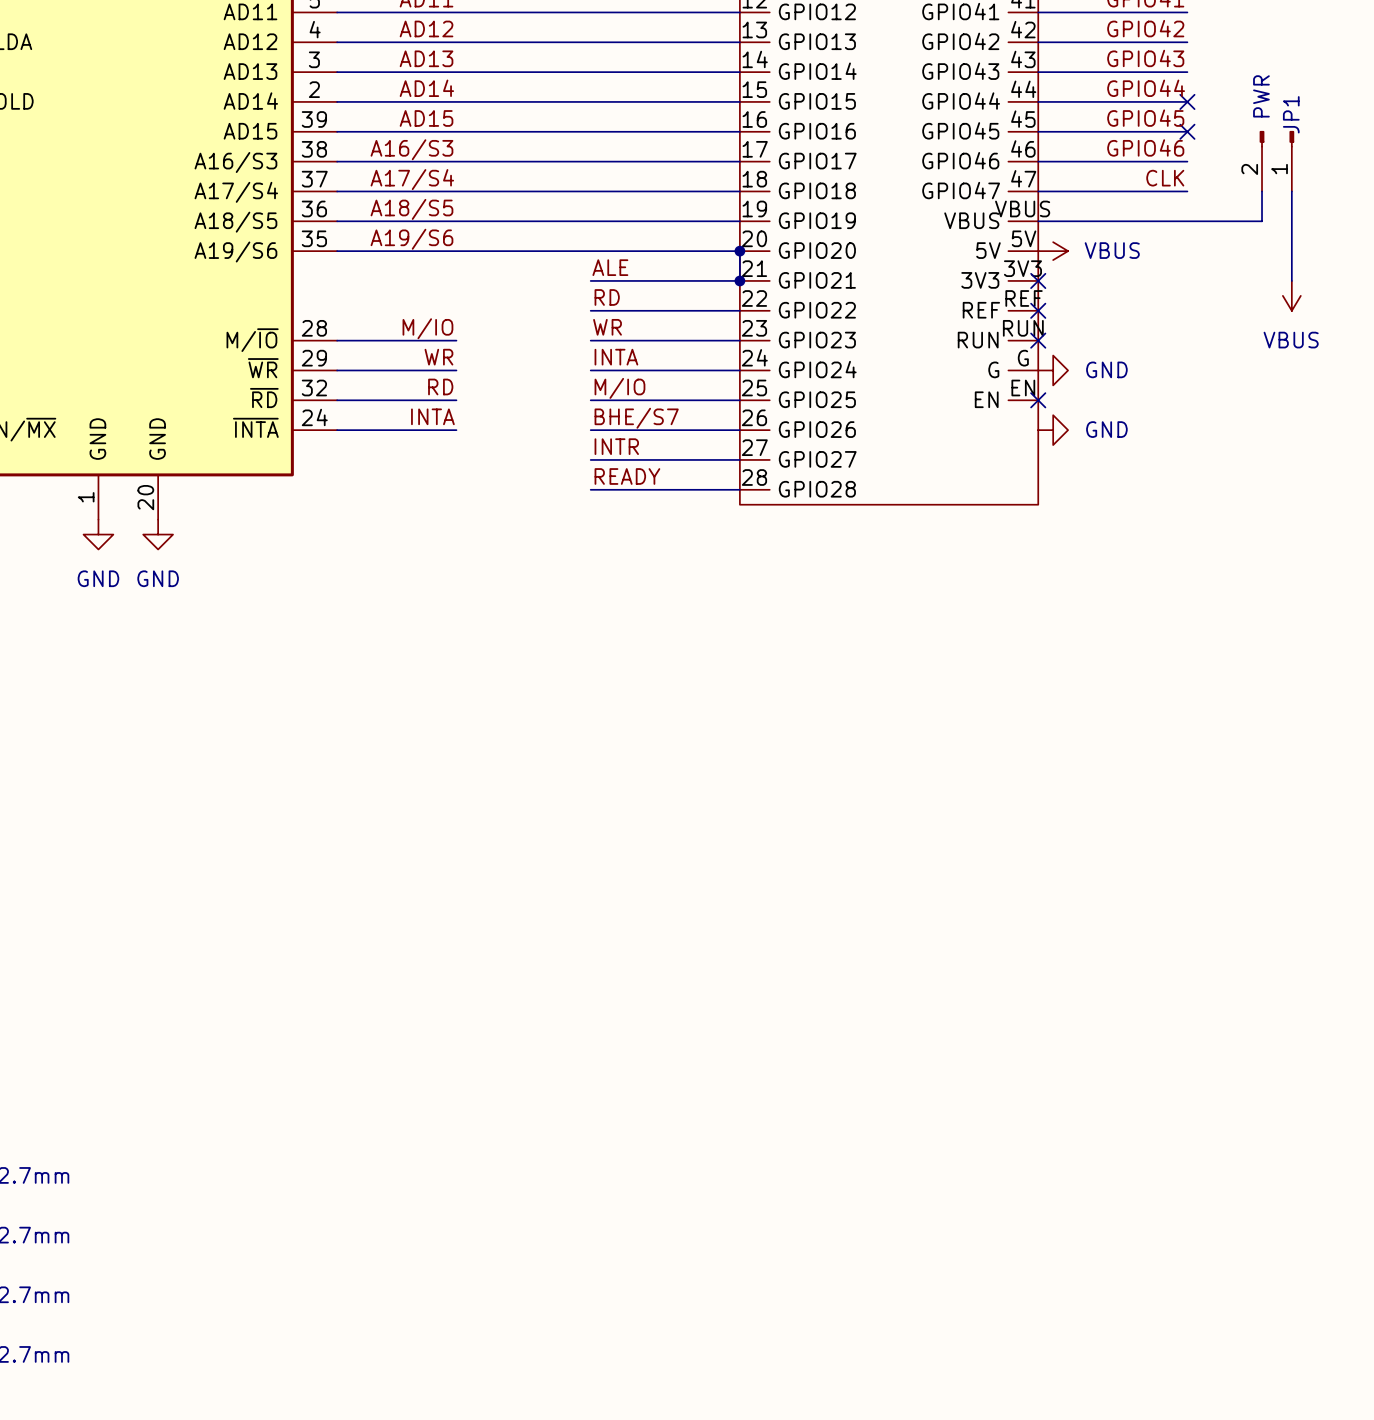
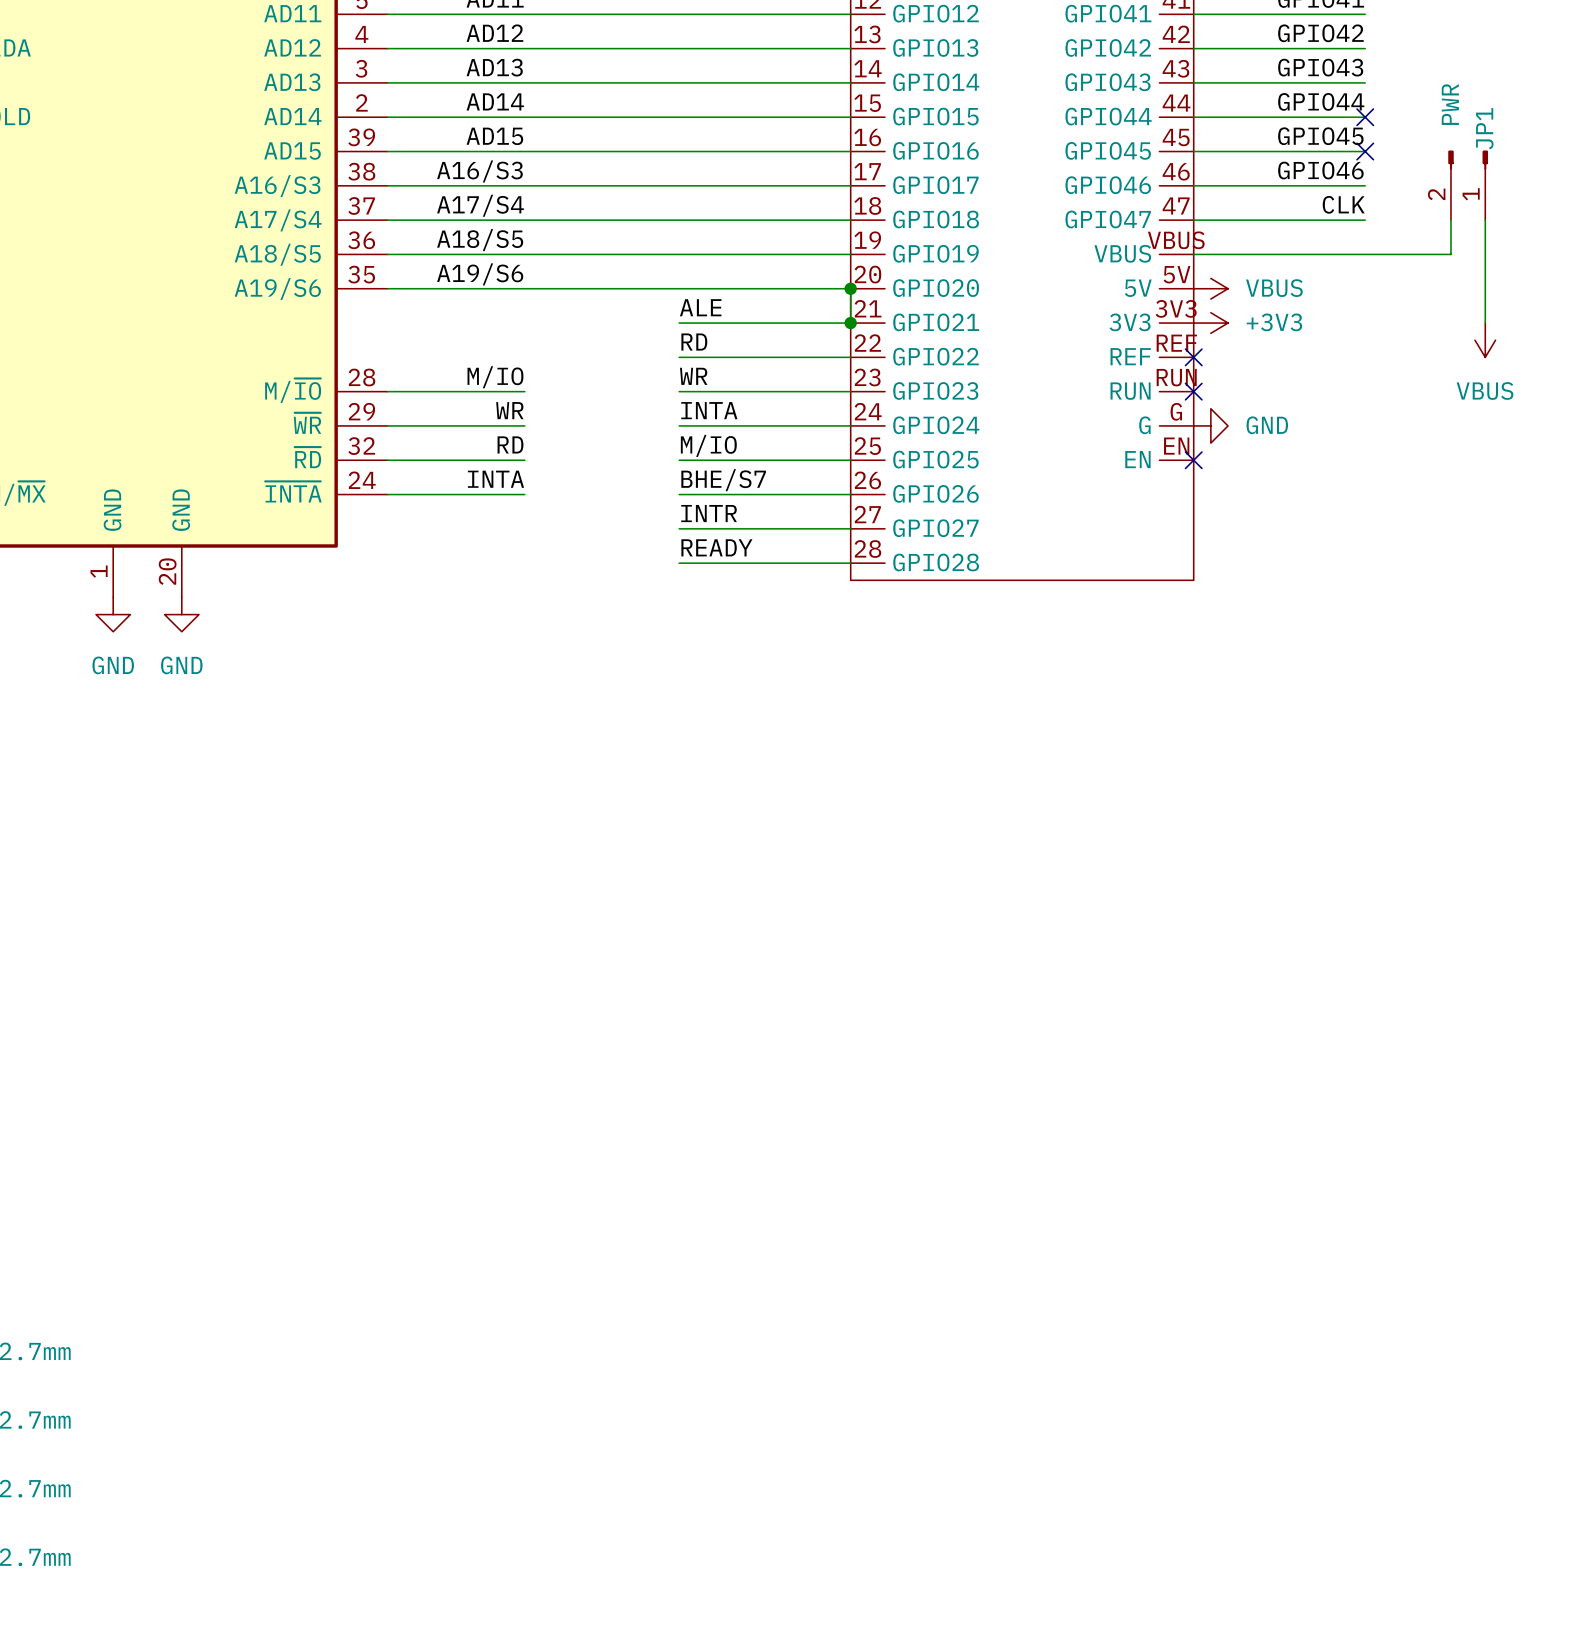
no-connect mark: (1038, 280) -> none
power symbol: none -> +3V3 (1210, 323)
power symbol: GND (1053, 430) -> none

